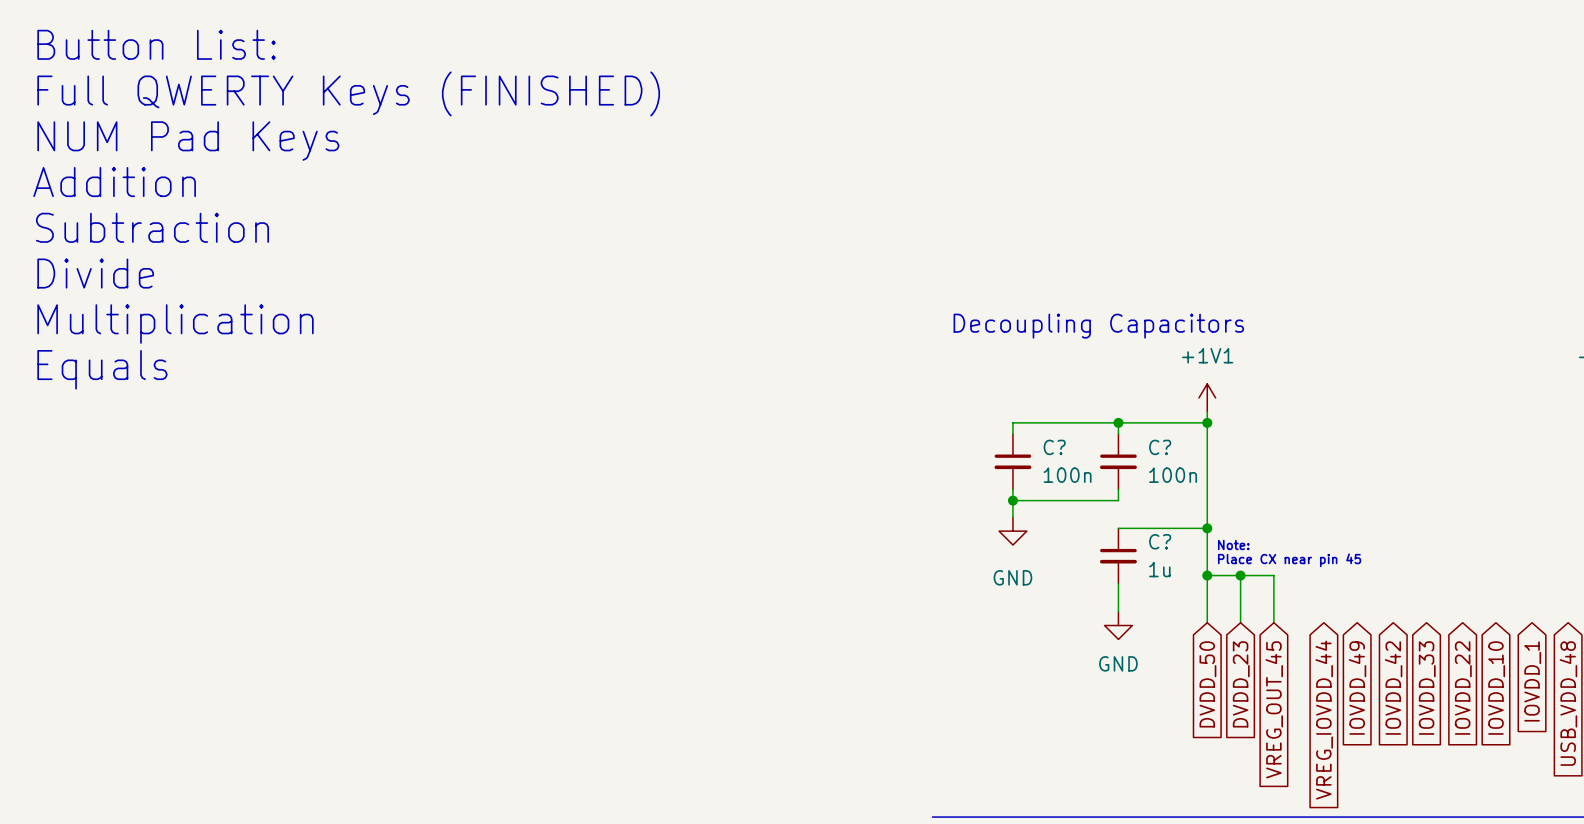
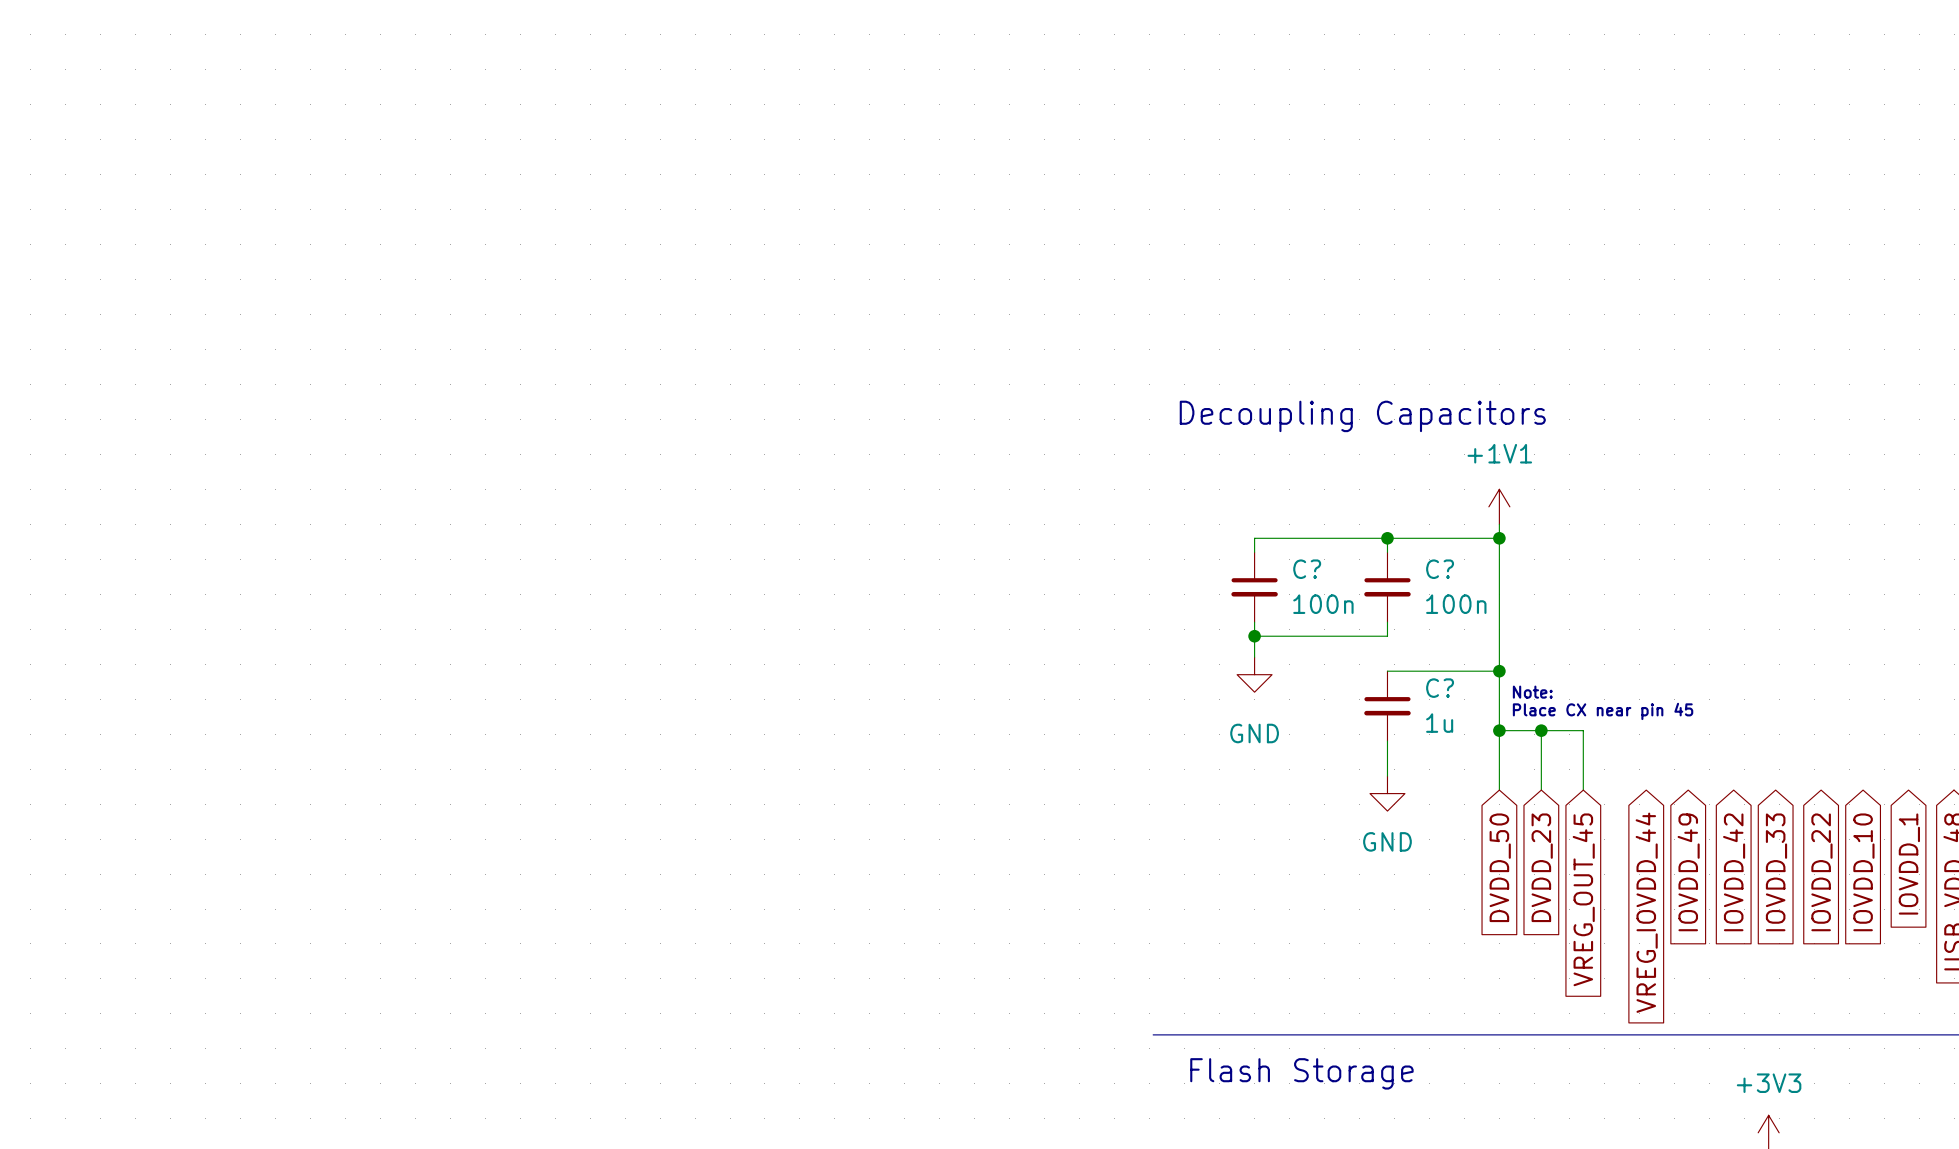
text: Button List: (156, 44) -> none
text: Full QWERTY Keys (FINISHED) (348, 93) -> none
text: NUM Pad Keys (188, 141) -> none
text: Addition (114, 182) -> none
text: Subtraction (152, 227) -> none
text: Divide (95, 273) -> none
text: Multiplication (175, 324) -> none
text: Equals (102, 369) -> none

